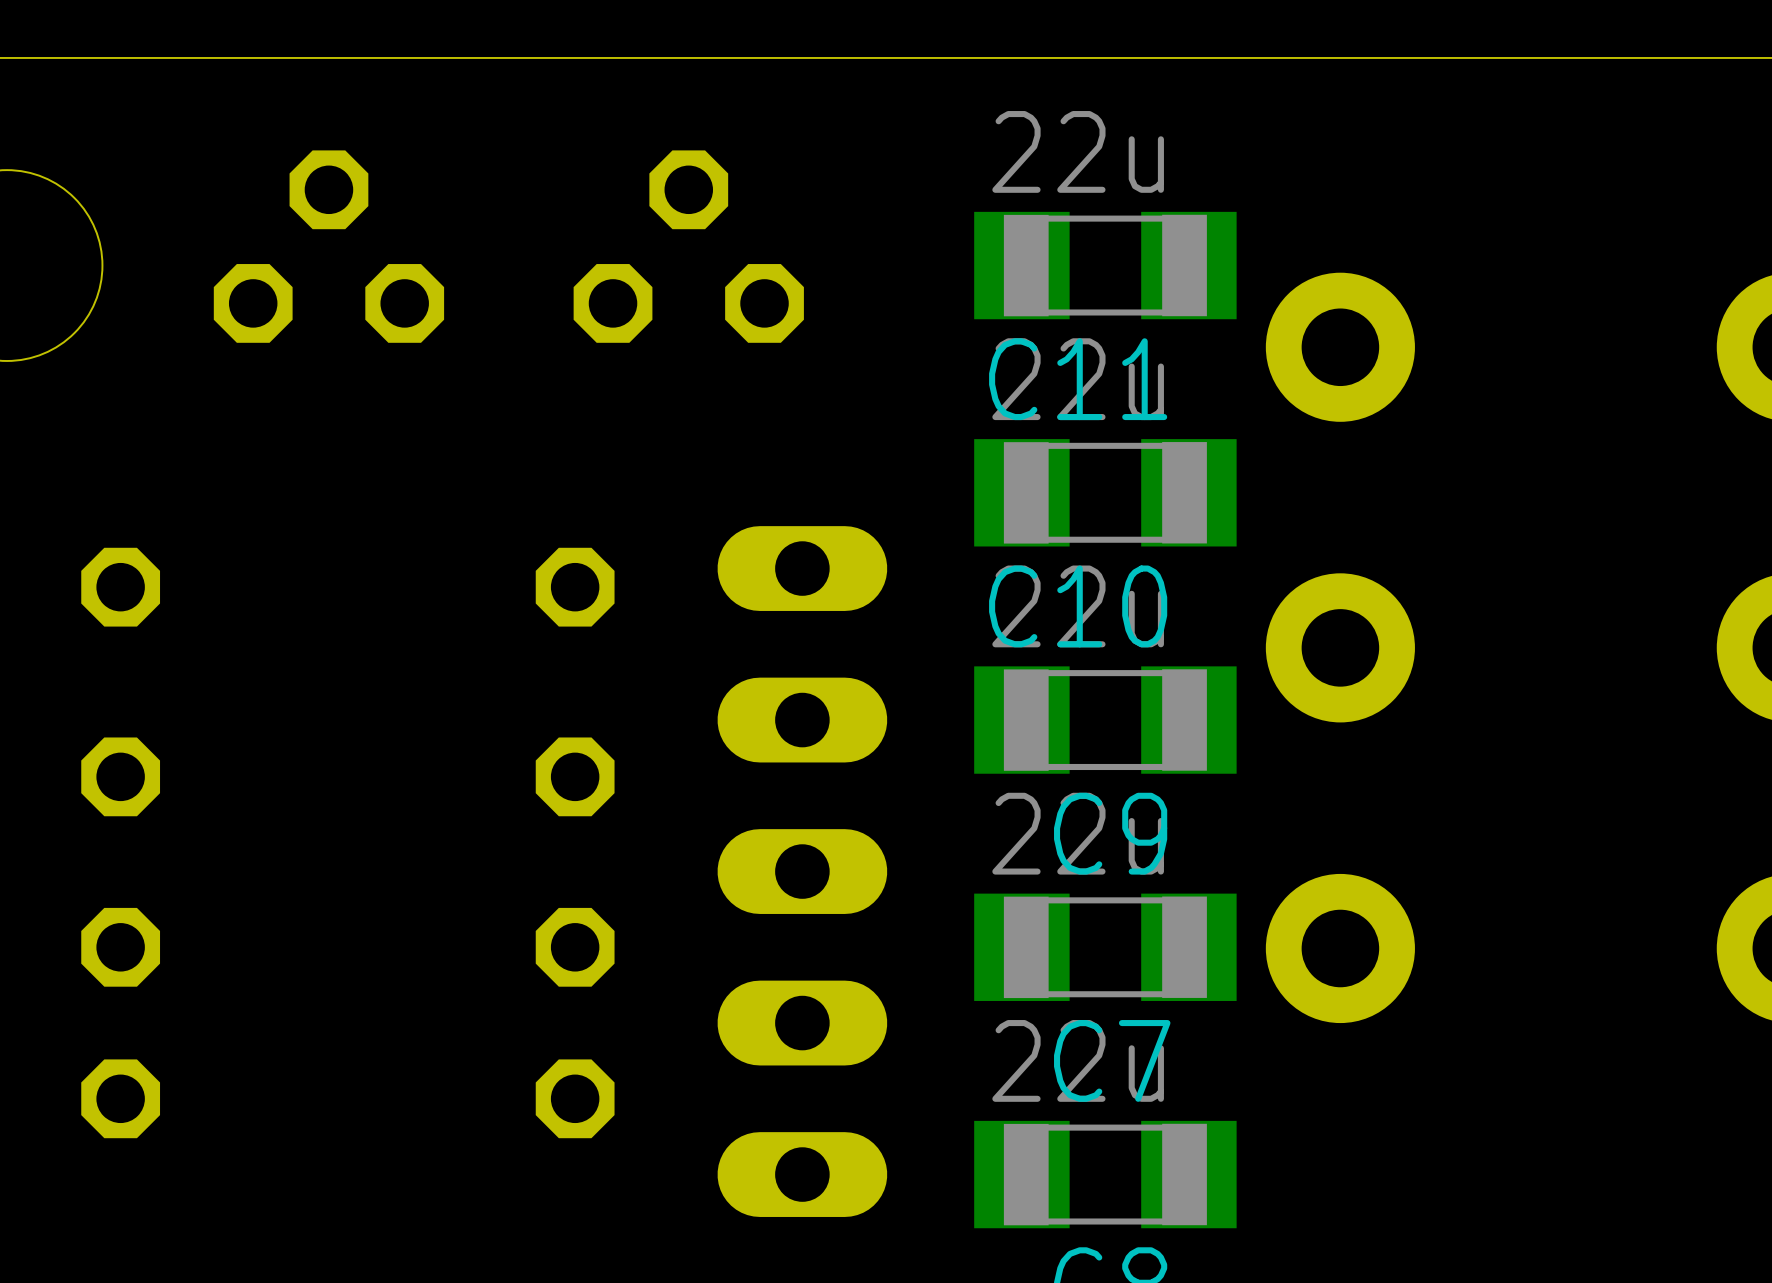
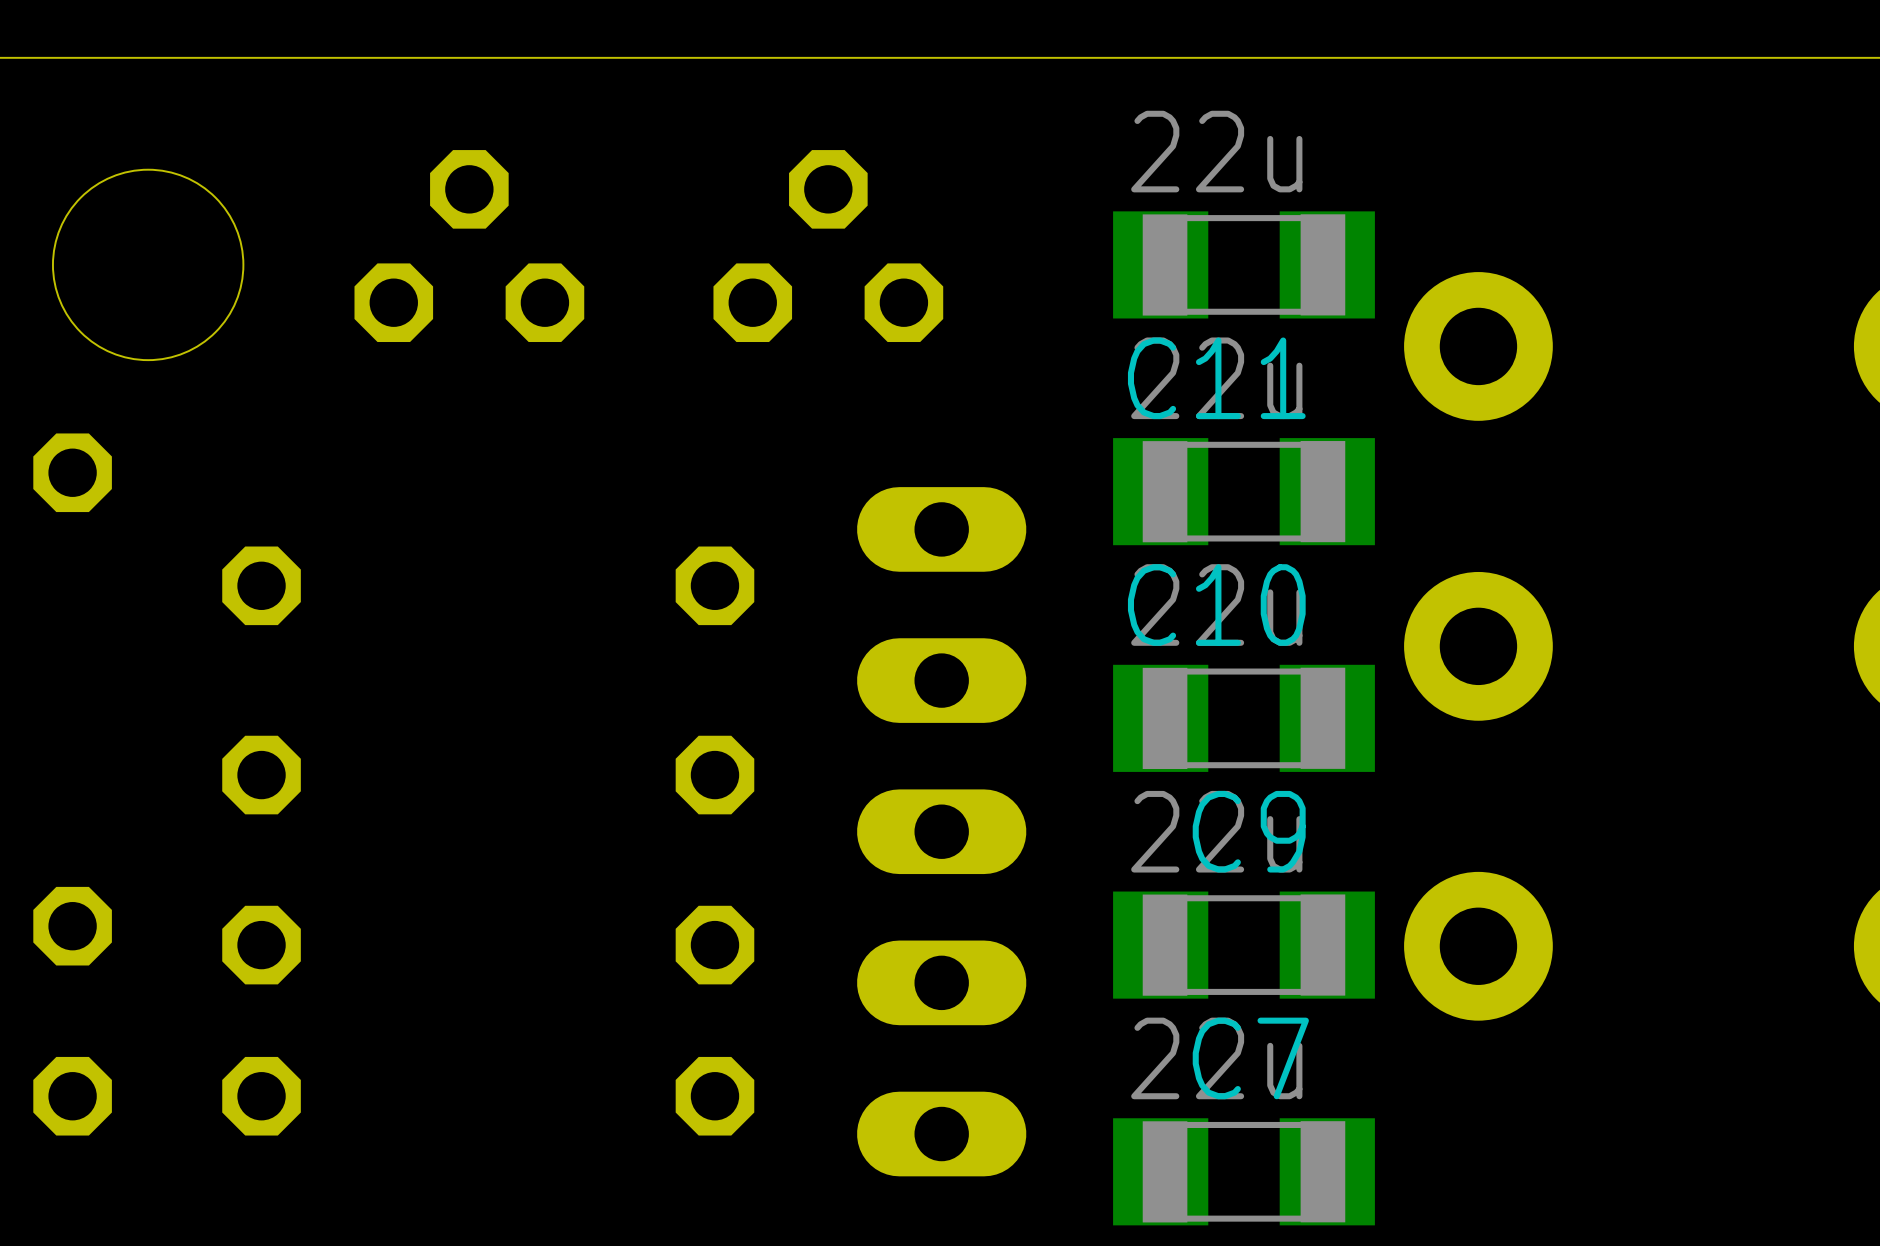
part position: (802, 871) -> (941, 831)

